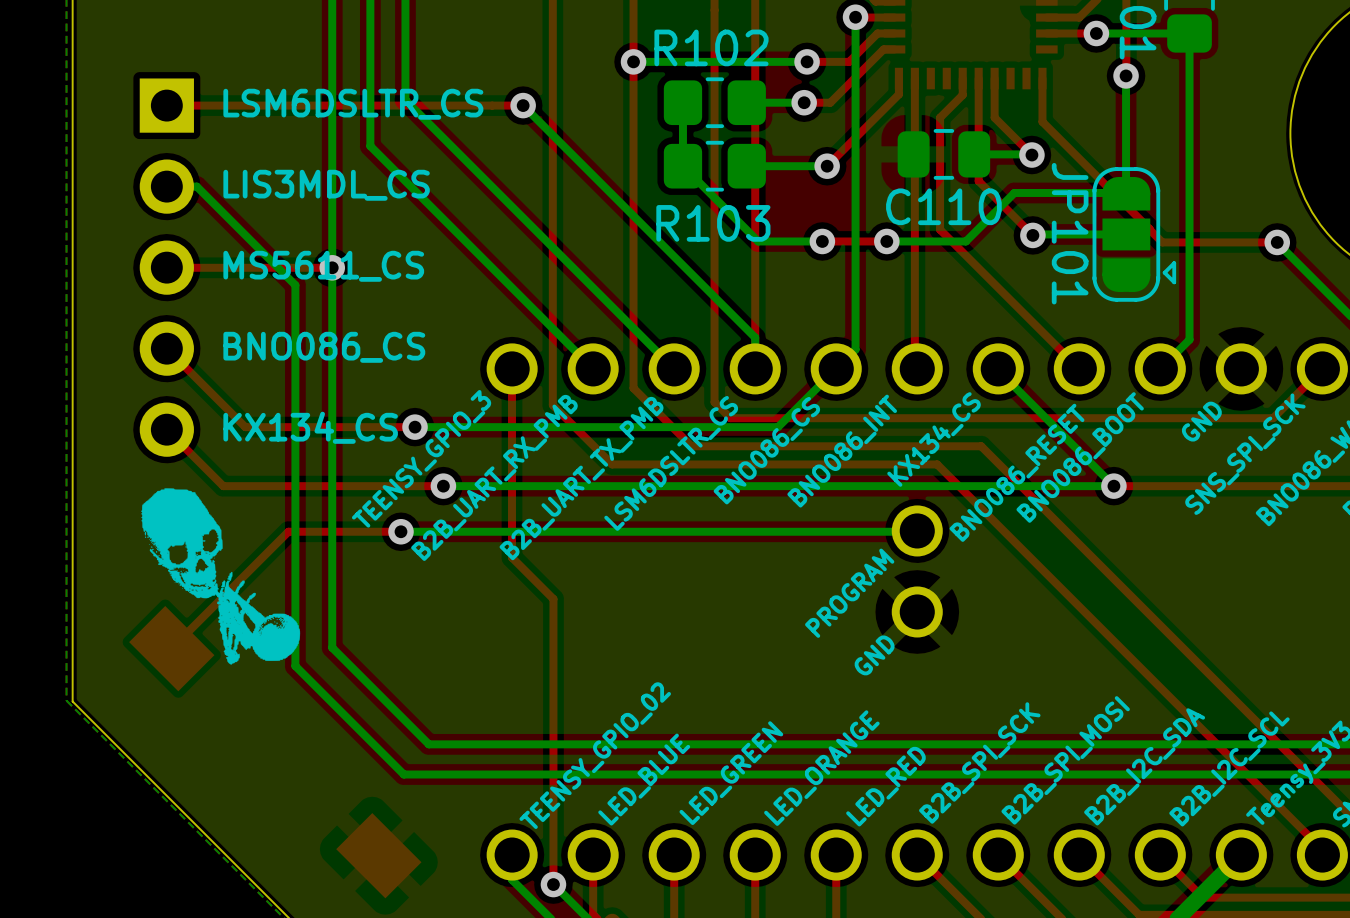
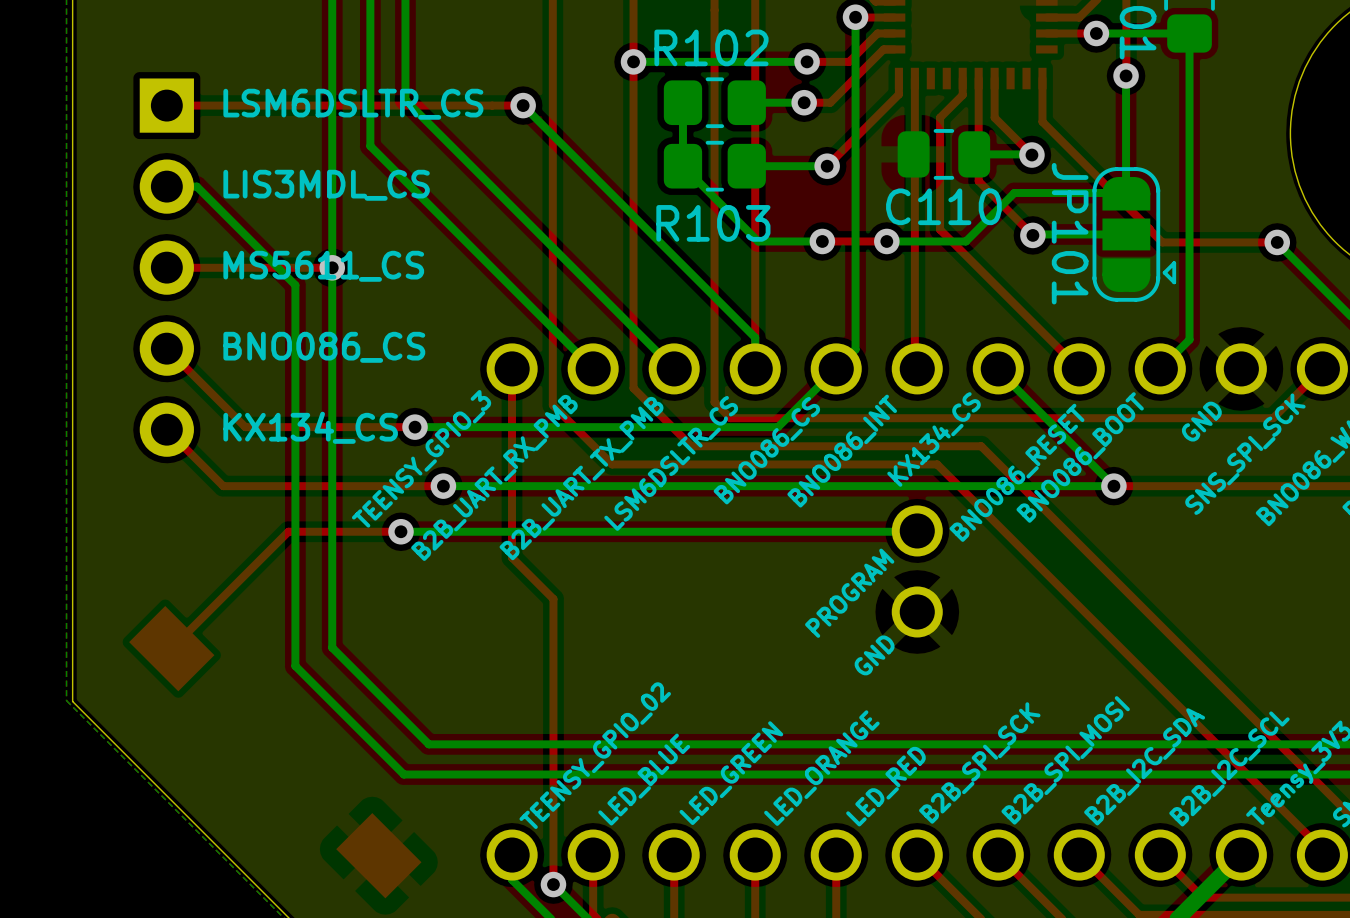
drawing: [141, 488, 301, 665] -> none

